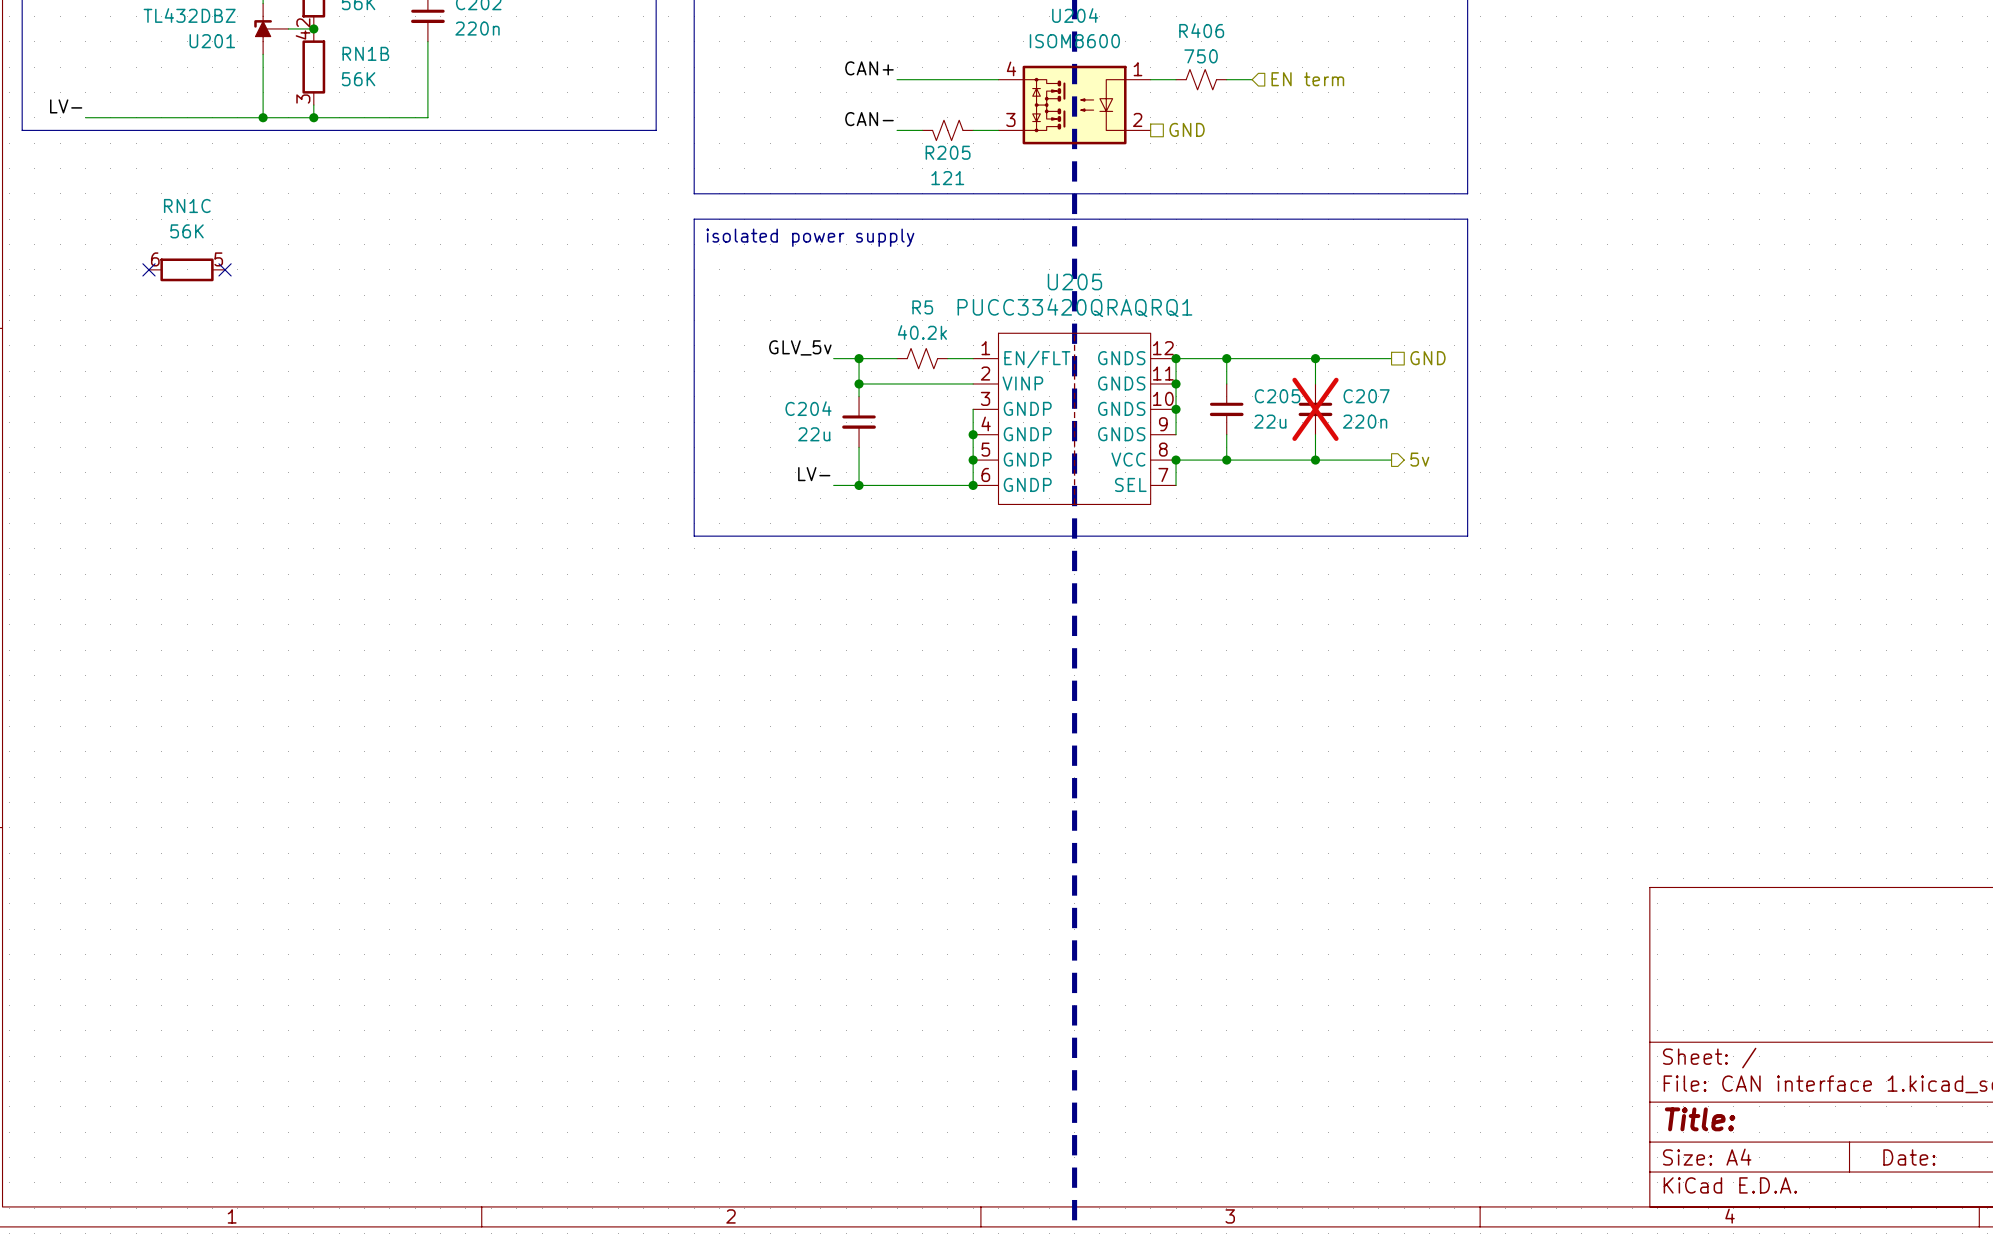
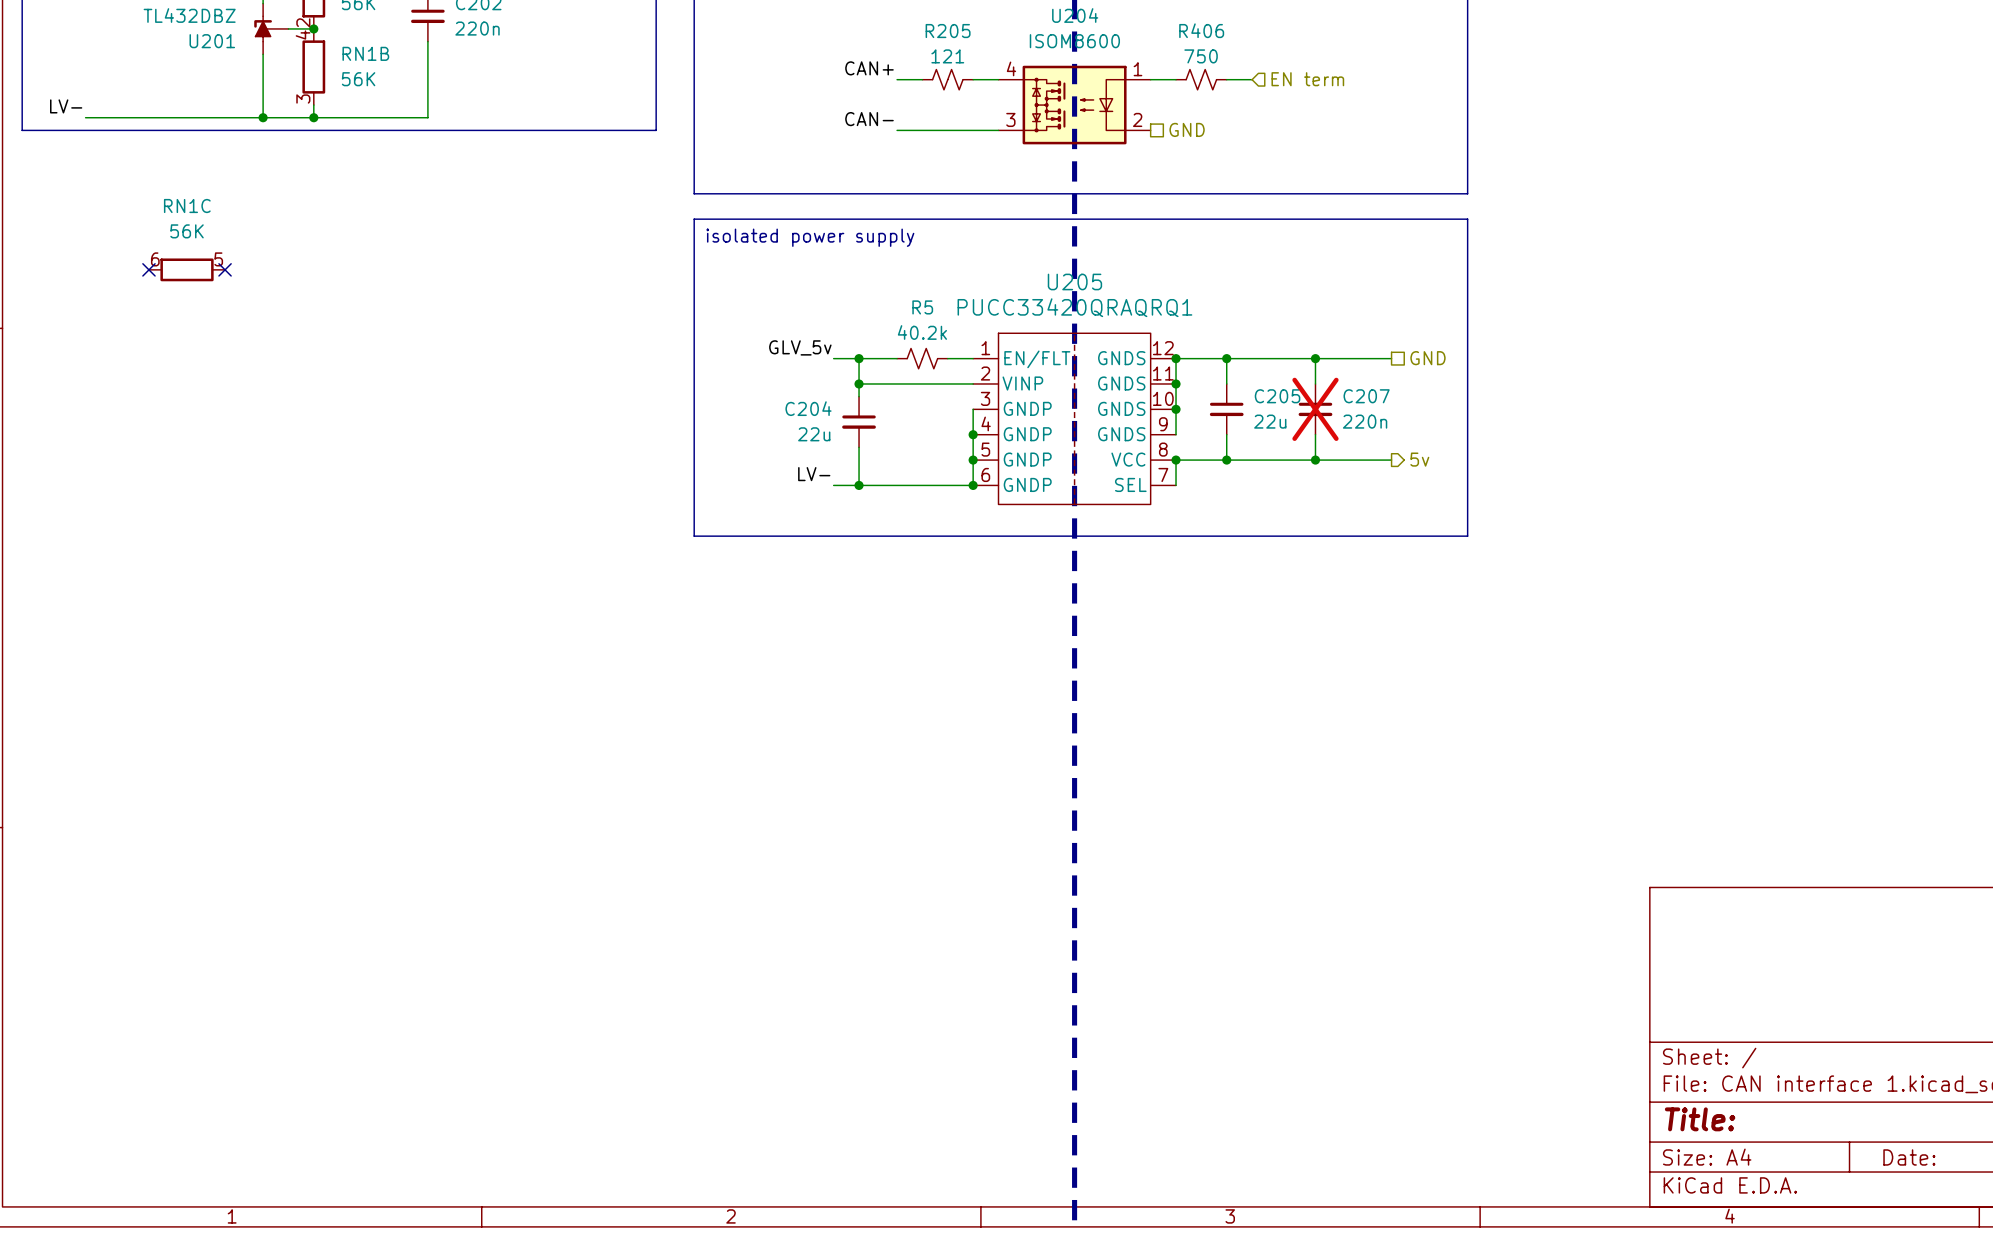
R205 flip: as is (947, 130) -> left-right (947, 79)
R205 position: (947, 130) -> (947, 79)
R205 name position: R205 (948, 152) -> R205 (948, 31)
R205 value position: 121 (947, 178) -> 121 (947, 56)

